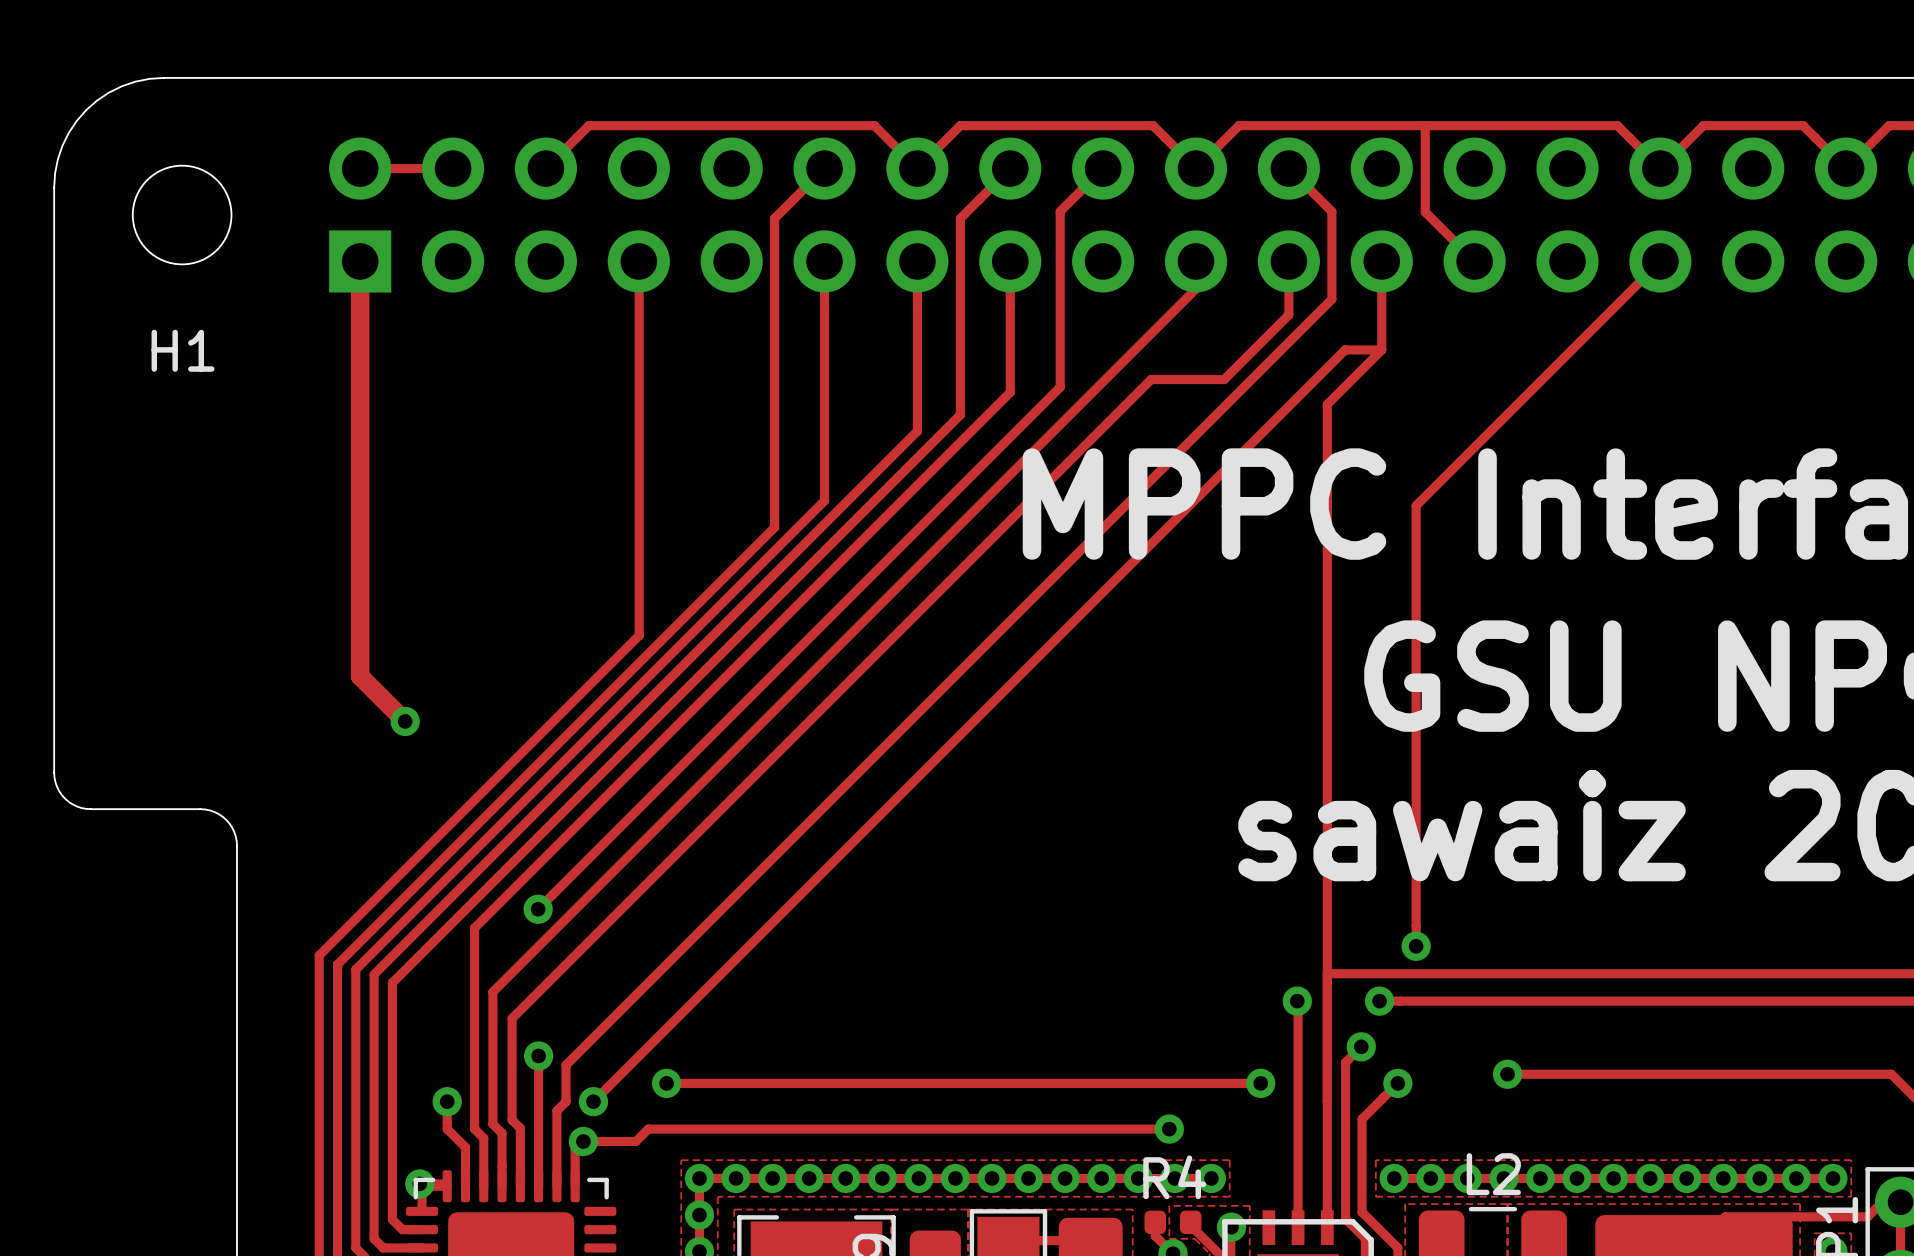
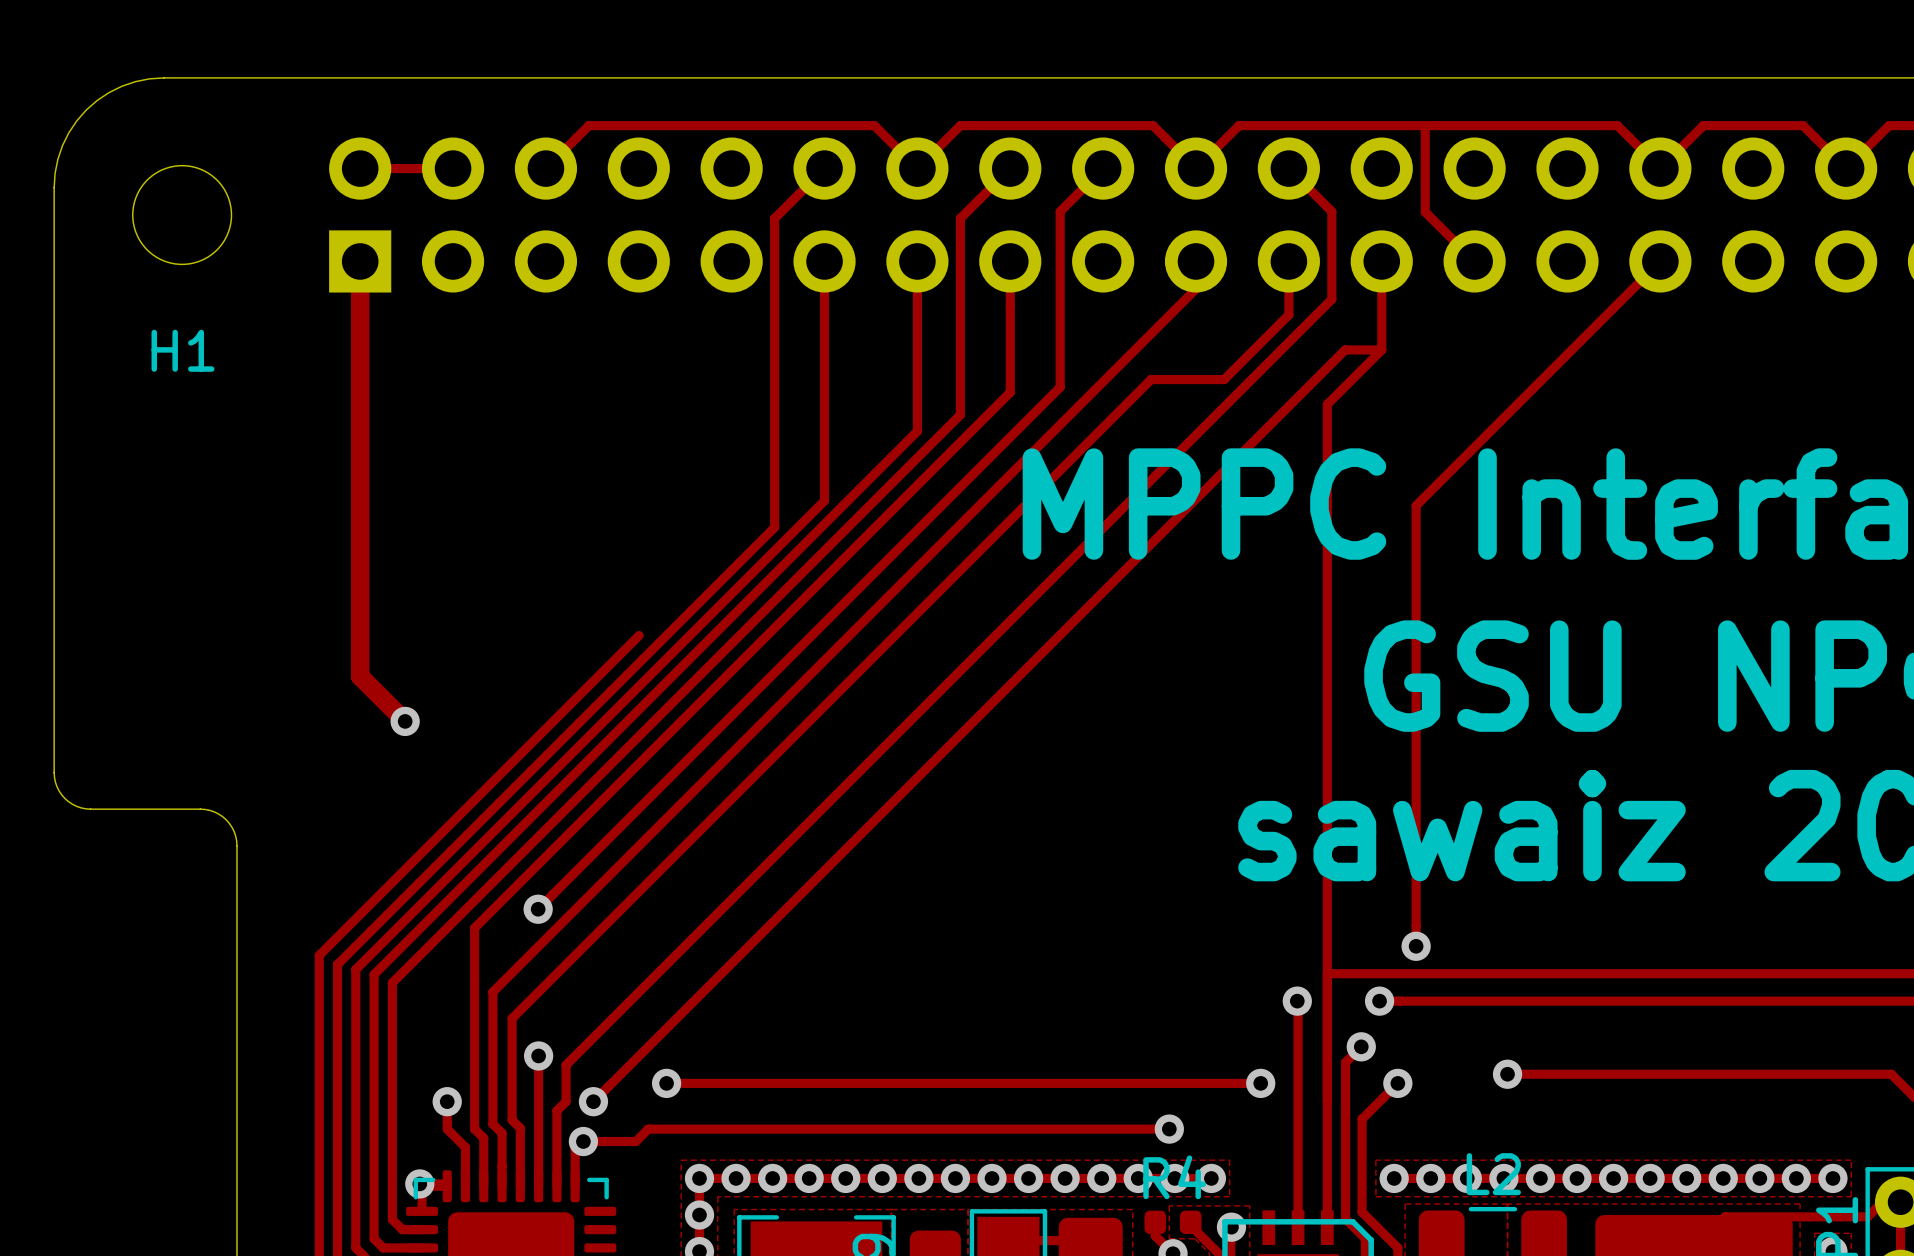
track: (639, 261) (639, 635) -> none

